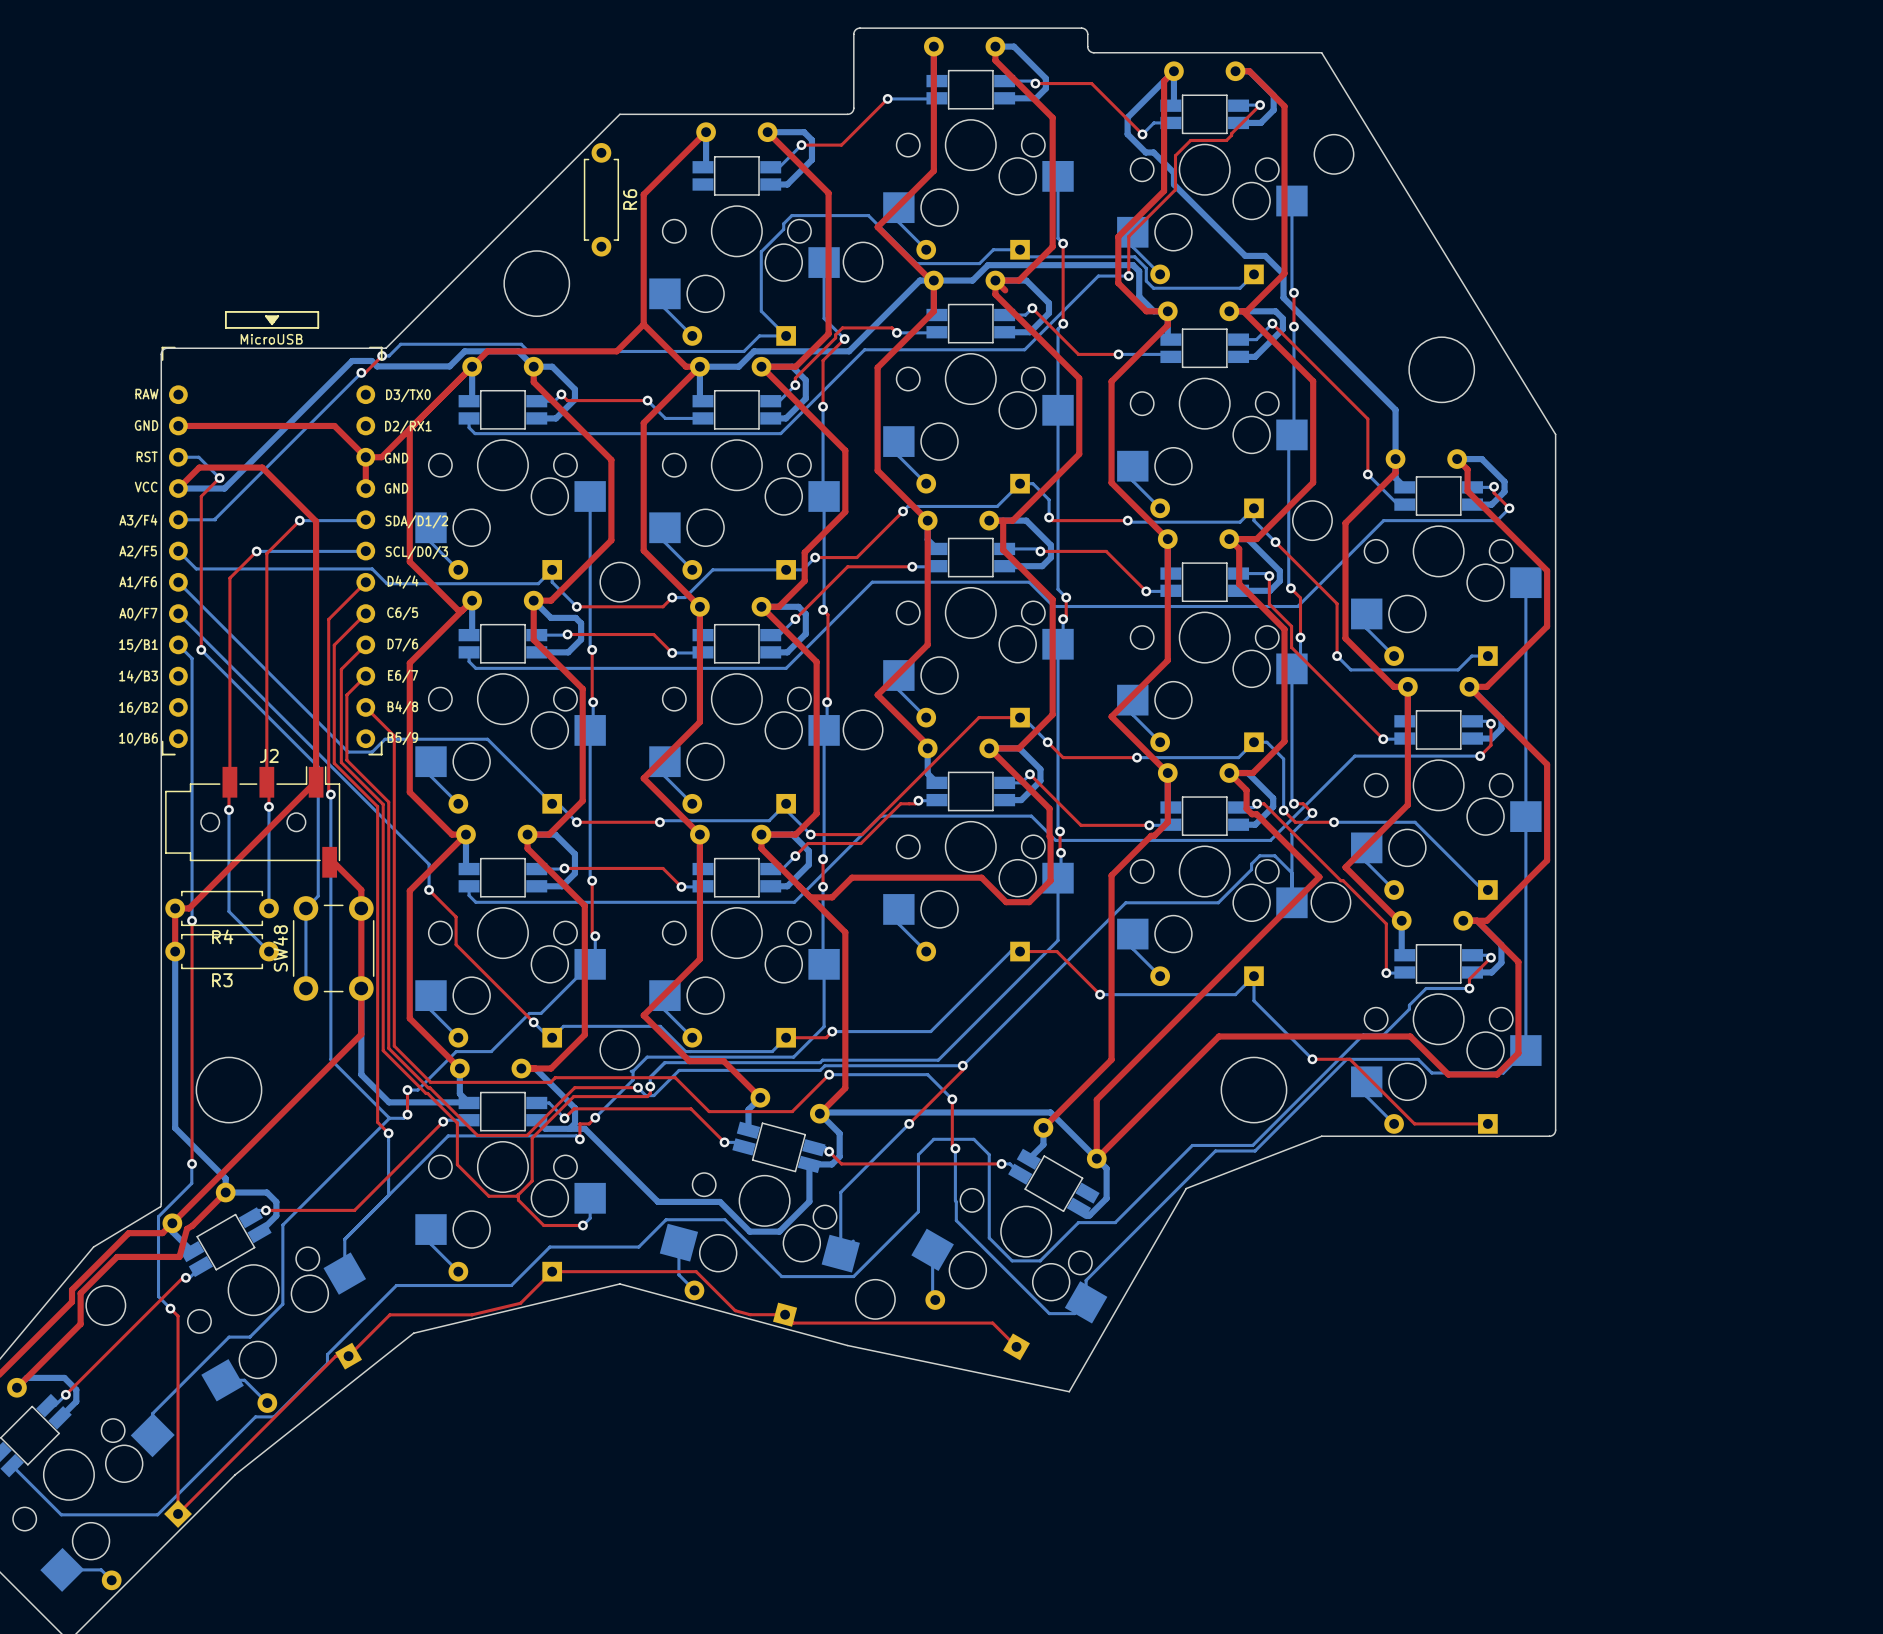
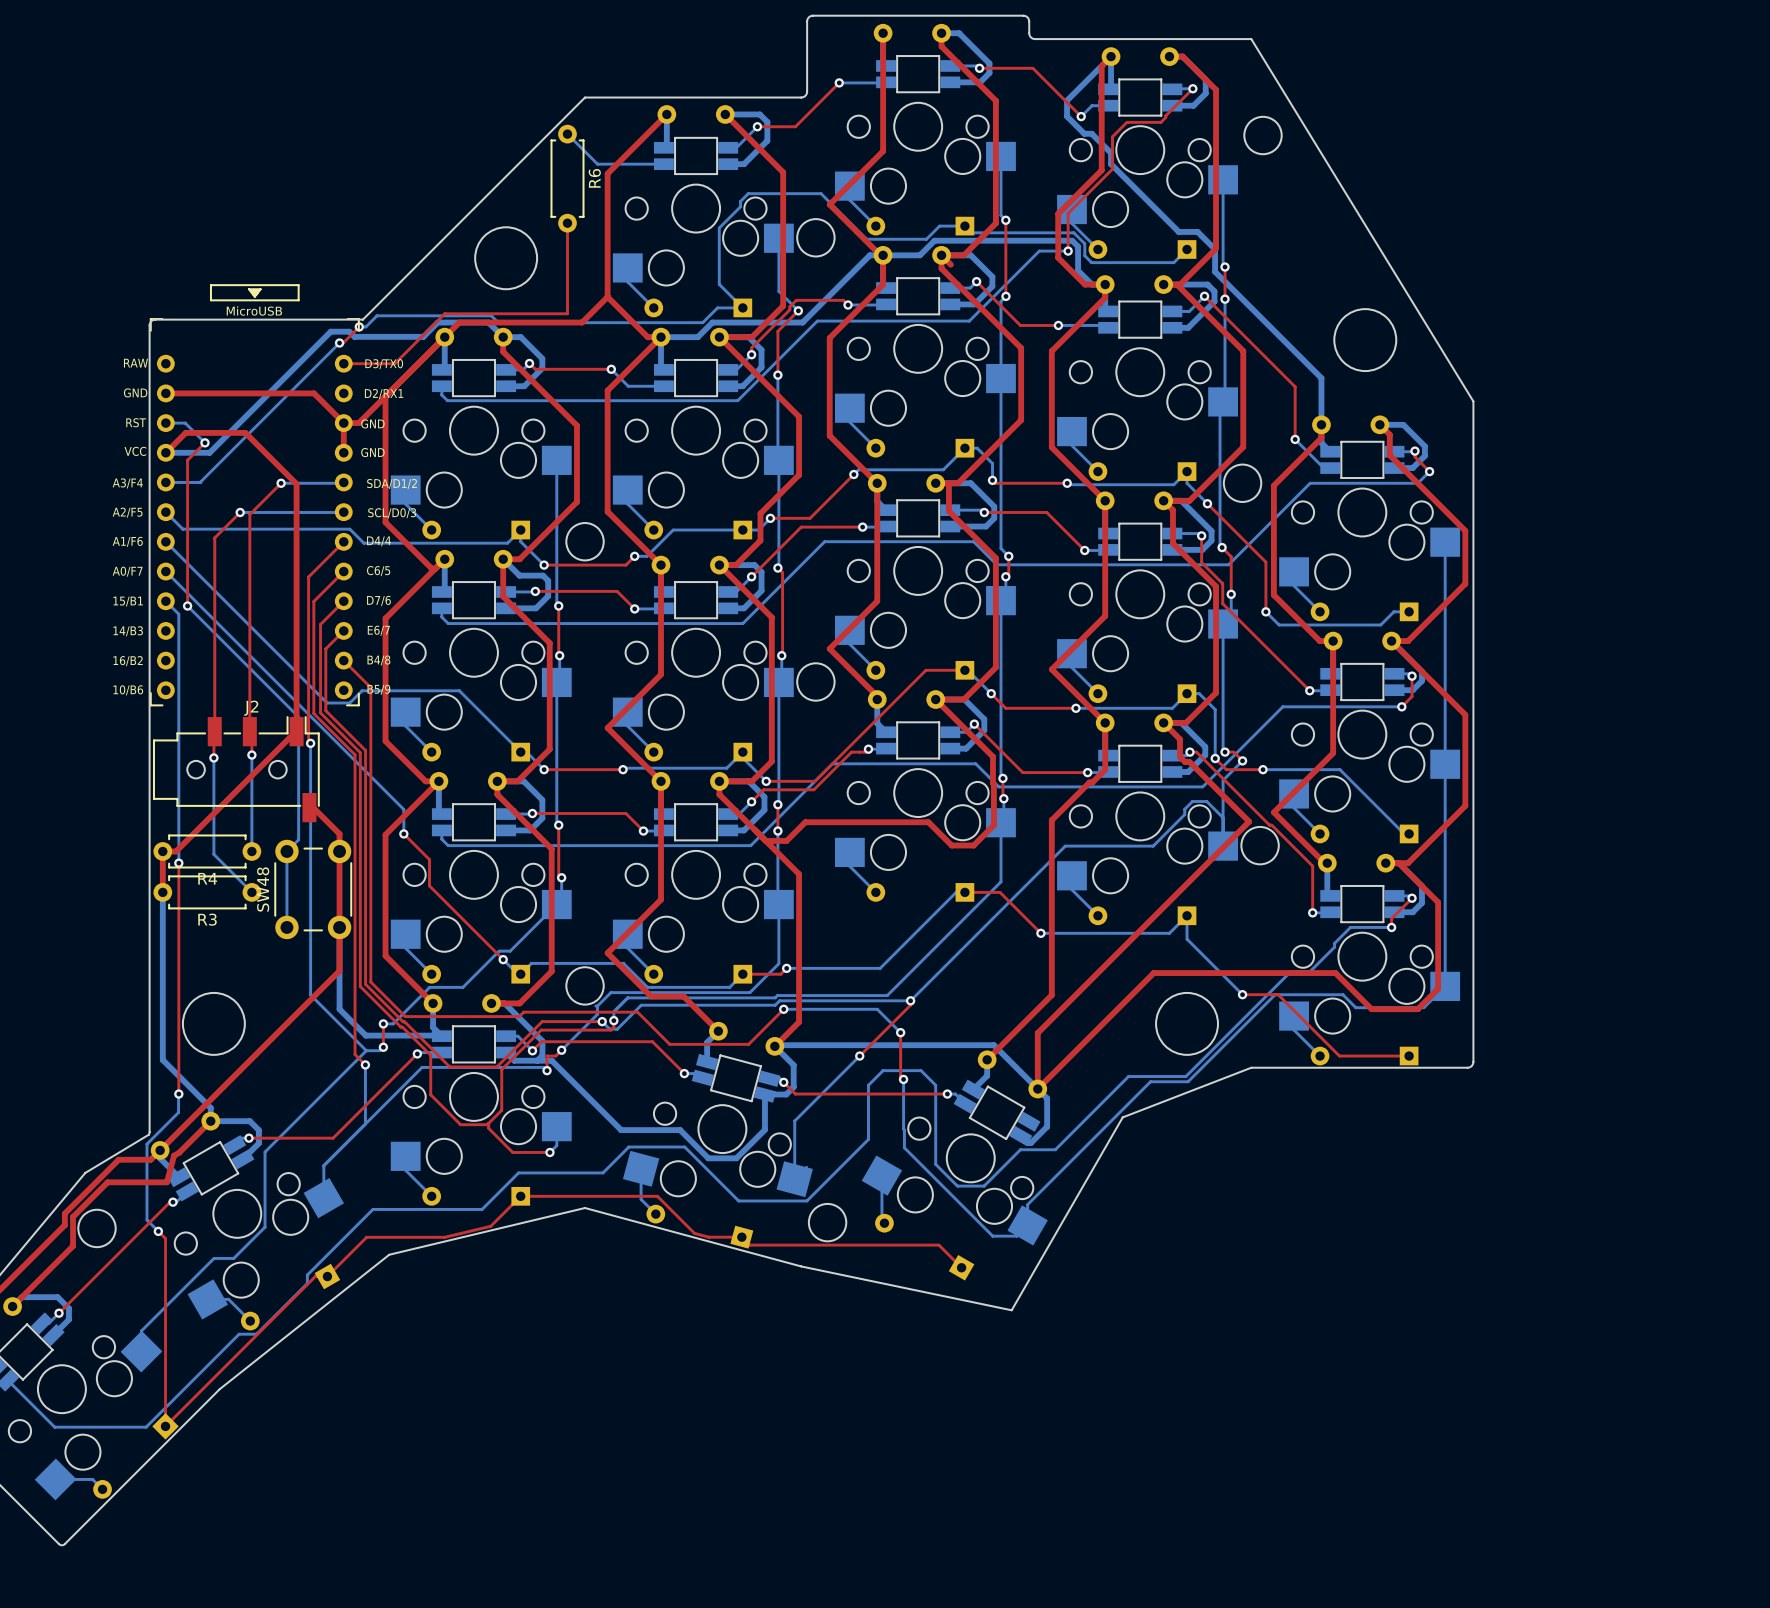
bottom track: none -> (567, 134) (597, 164) (663, 164)
top track: none -> (567, 223) (567, 313) (444, 313) (394, 363) (343, 363)

